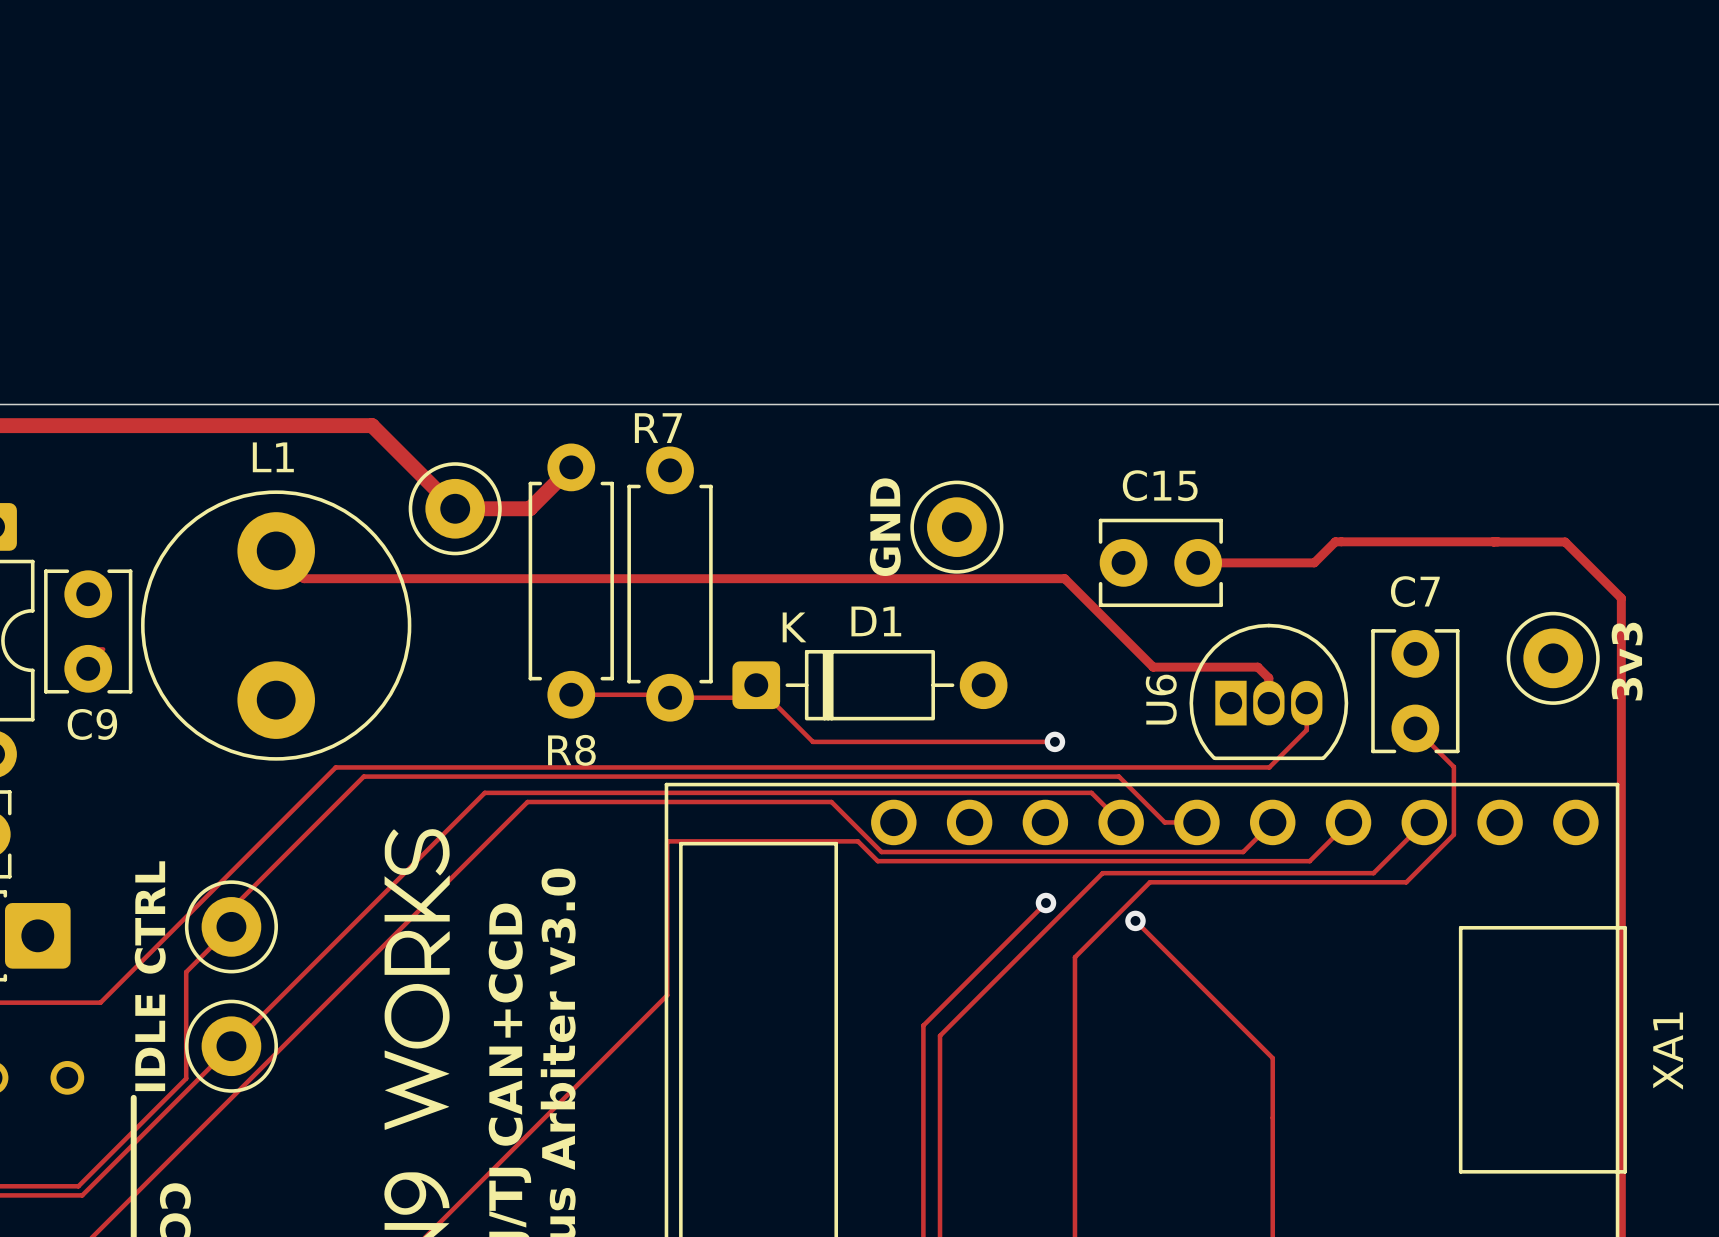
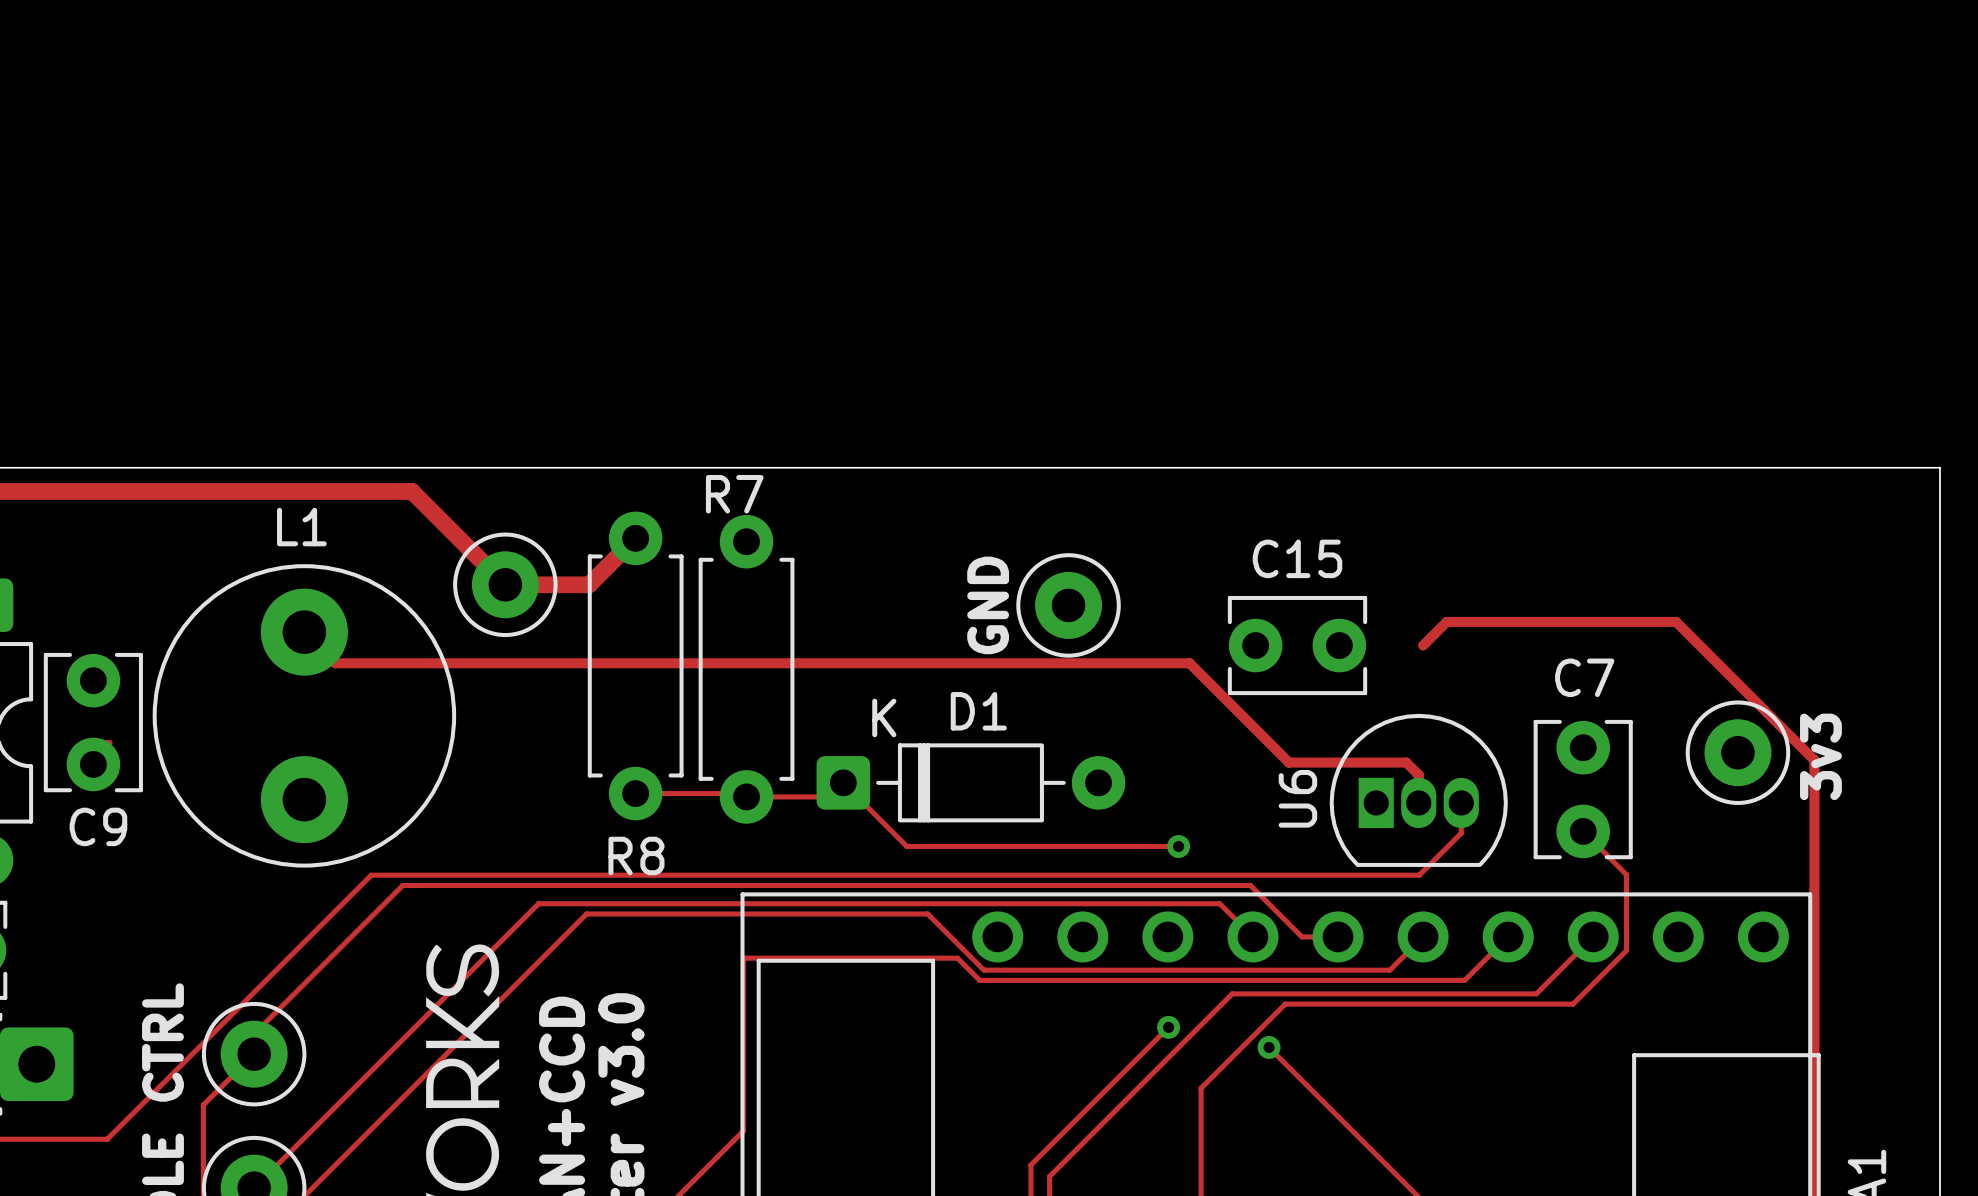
track: (1335, 541) (1314, 562) (1198, 562) -> (1493, 621) (1446, 621) (1423, 645)
track: (1493, 541) (1565, 541) (1621, 598) (1621, 665) -> (1676, 621) (1814, 760)

